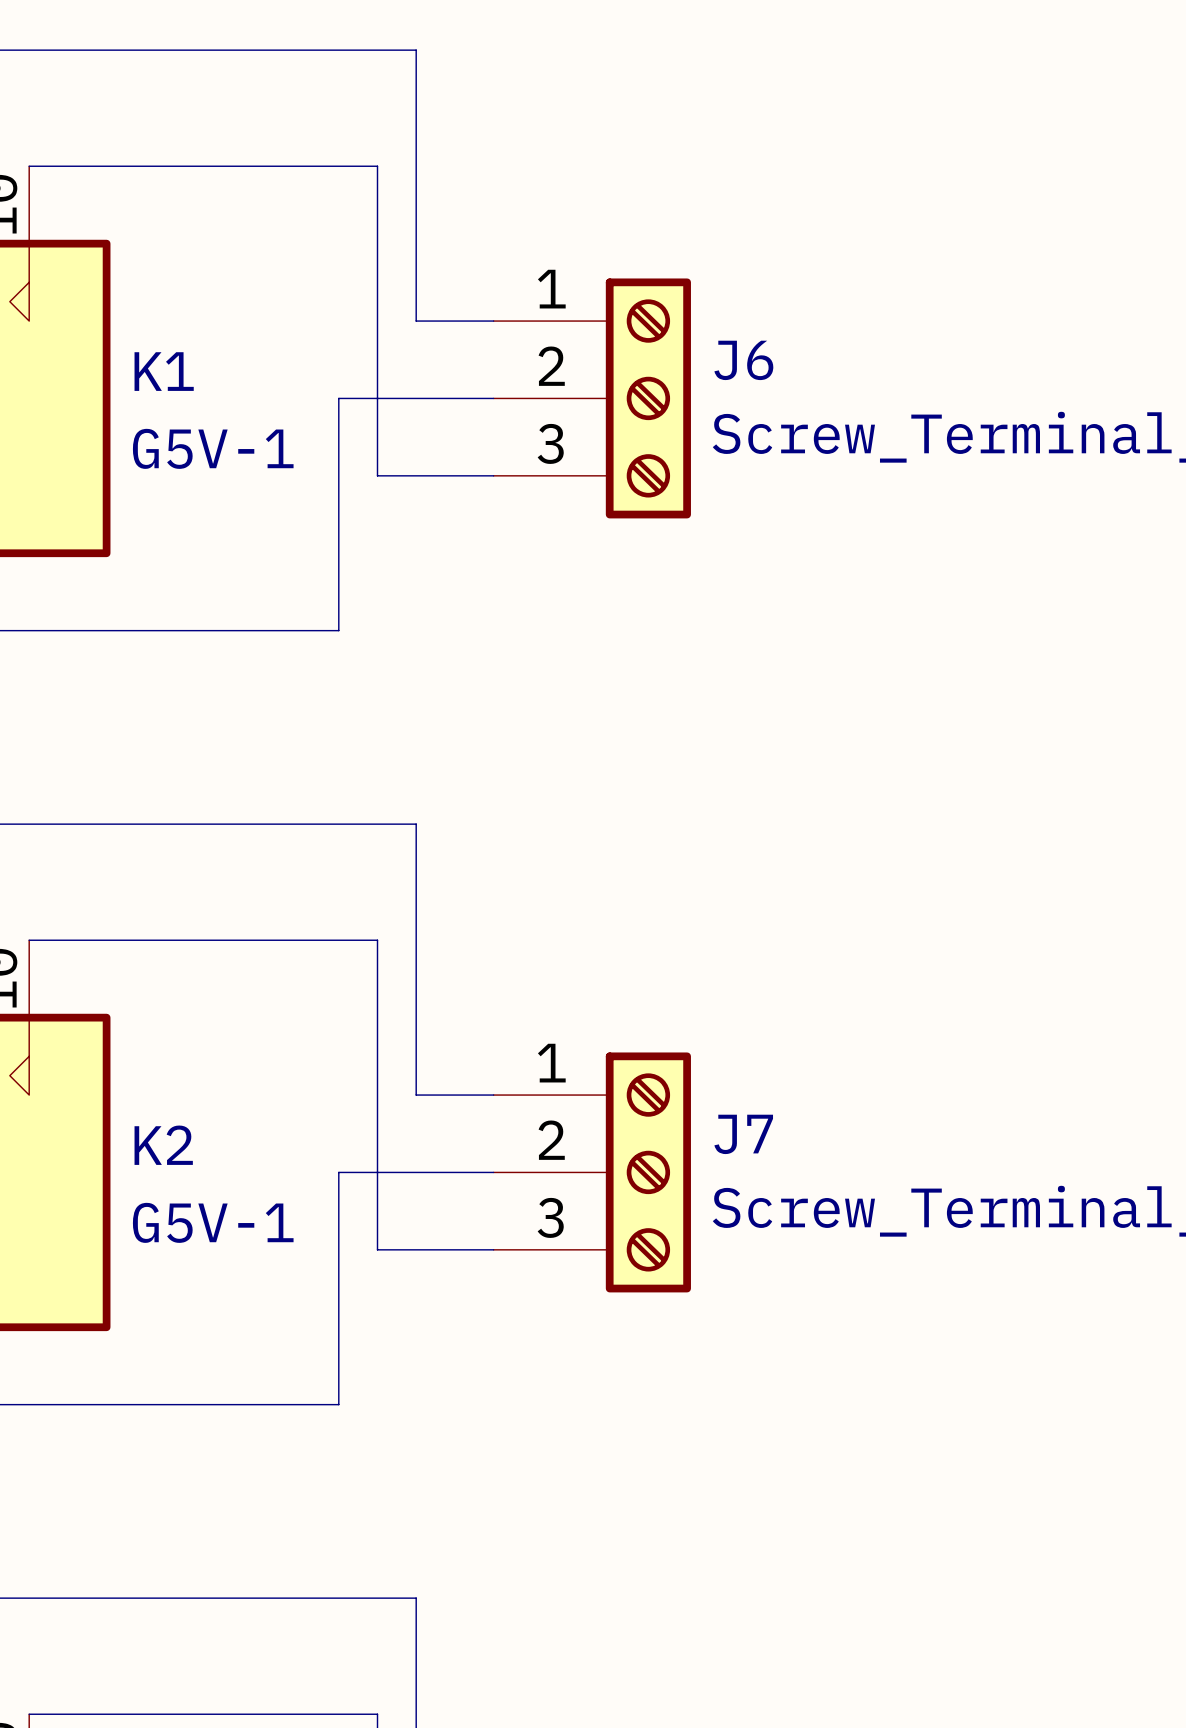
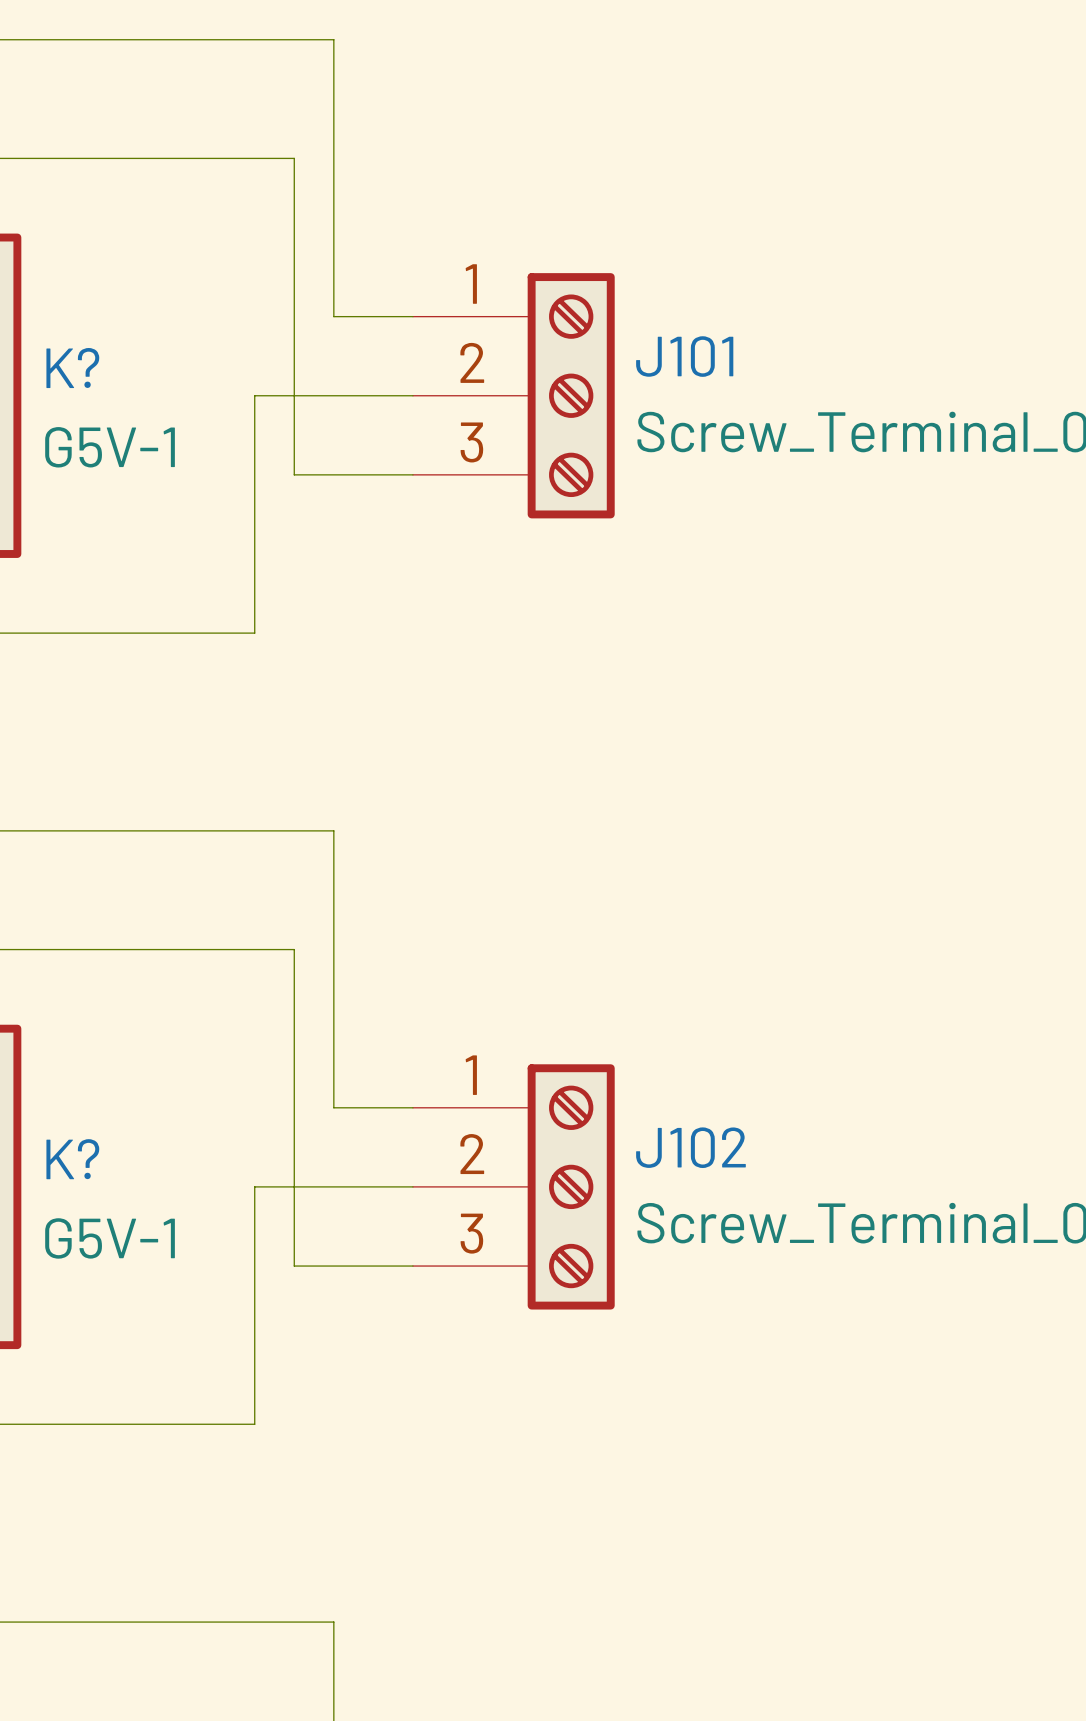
J6 name: J6 (743, 360) -> J101 (684, 356)
K1 name: K1 (164, 371) -> K? (72, 368)
J7 name: J7 (743, 1134) -> J102 (690, 1147)
K2 name: K2 (163, 1145) -> K? (72, 1159)

